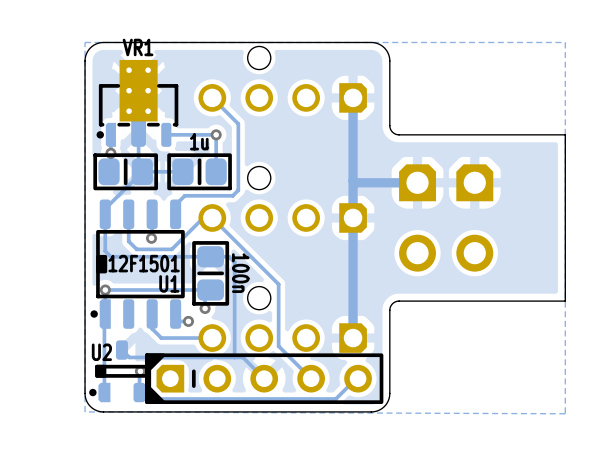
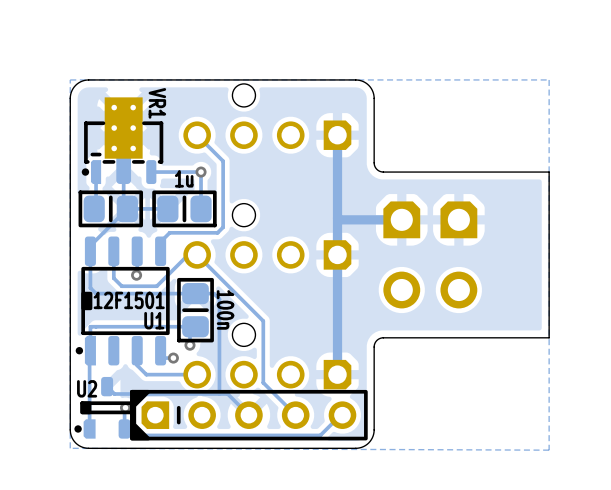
VR1 name rotation: 0° (138, 47) -> 90° clockwise (157, 103)
VR1 footprint: [96, 59, 179, 147] -> [81, 97, 164, 185]
via: (110, 153) -> none
via: (105, 290) -> none

